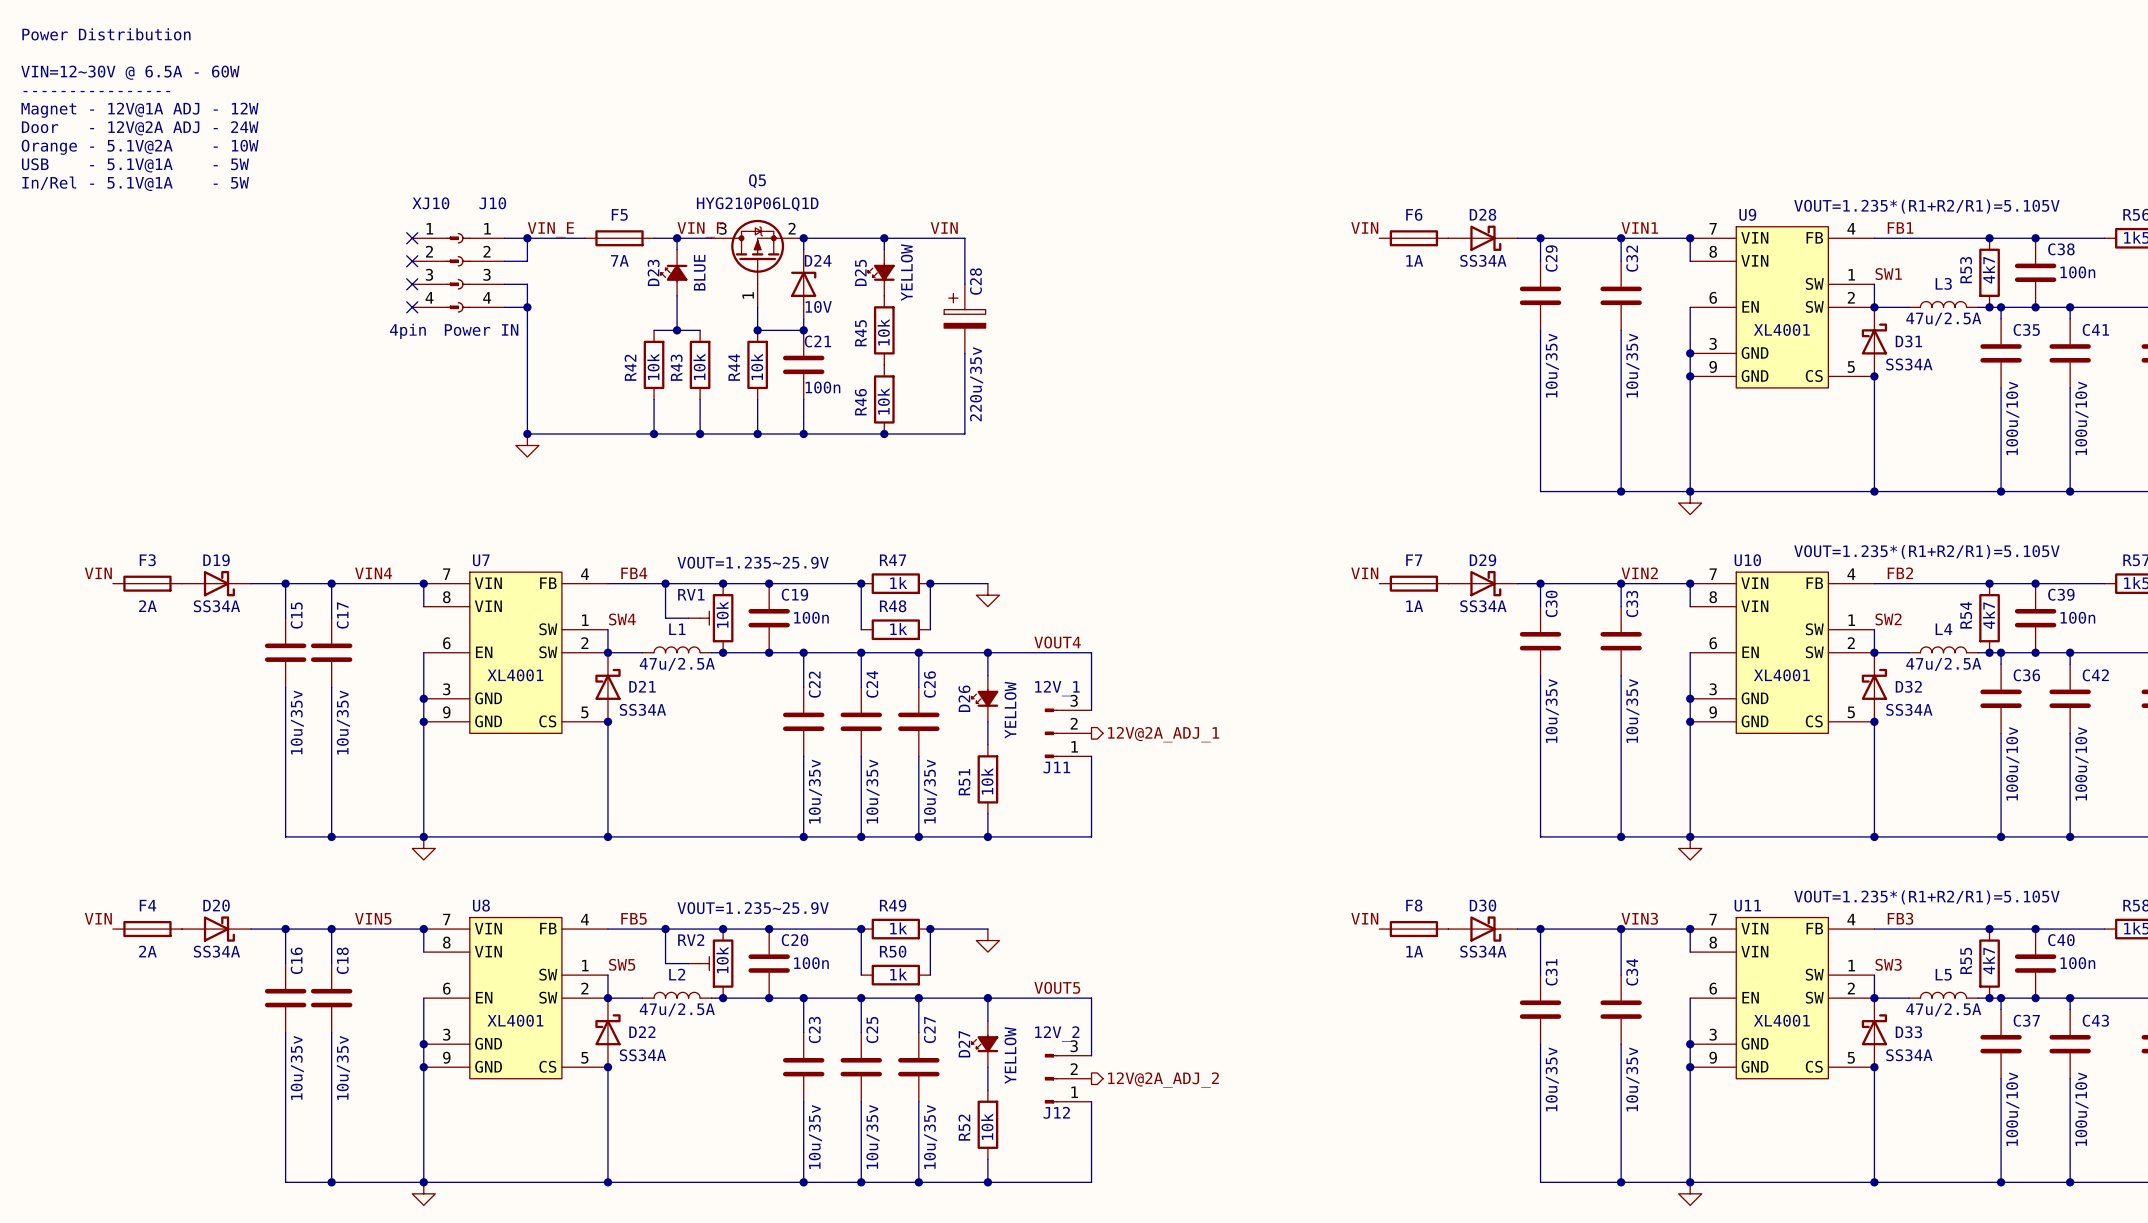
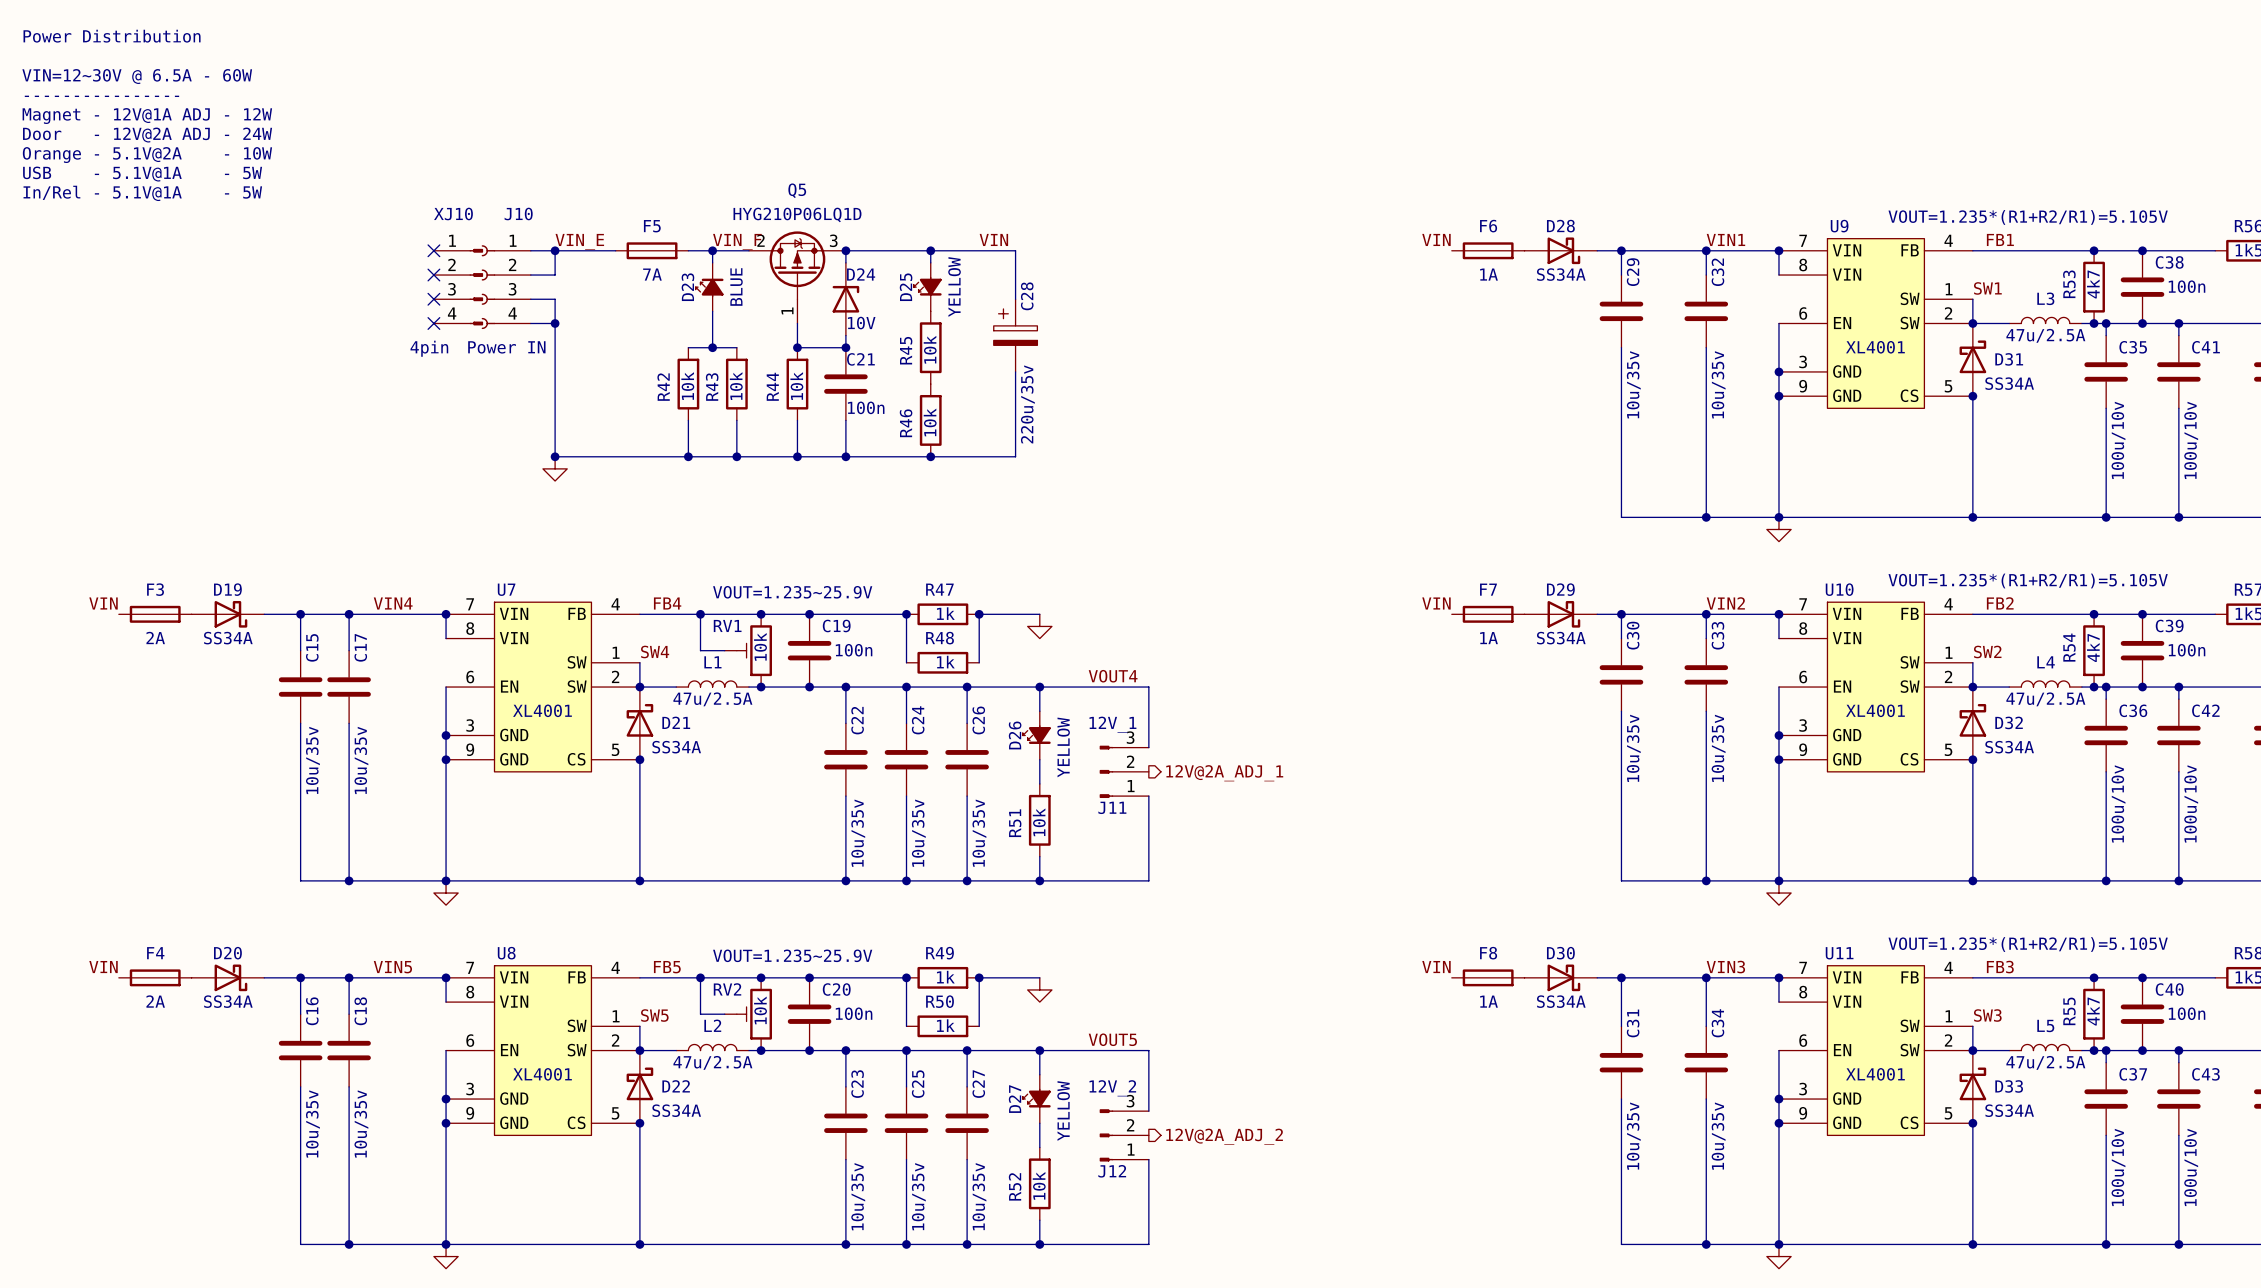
Q5 pin number: 3 (723, 228) -> 2 (761, 240)
Q5 pin number: 2 (792, 228) -> 3 (833, 240)

